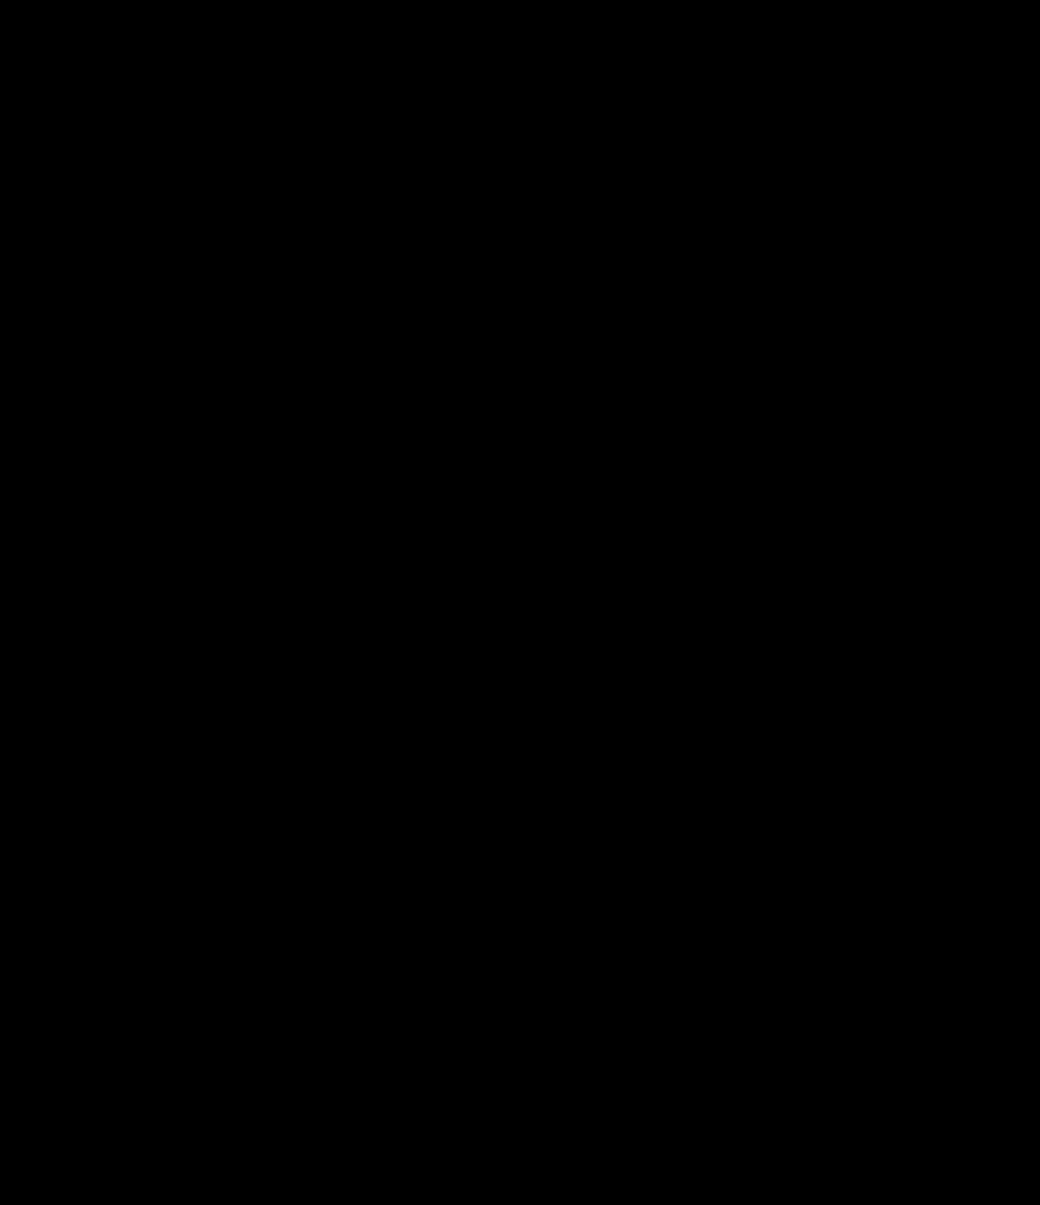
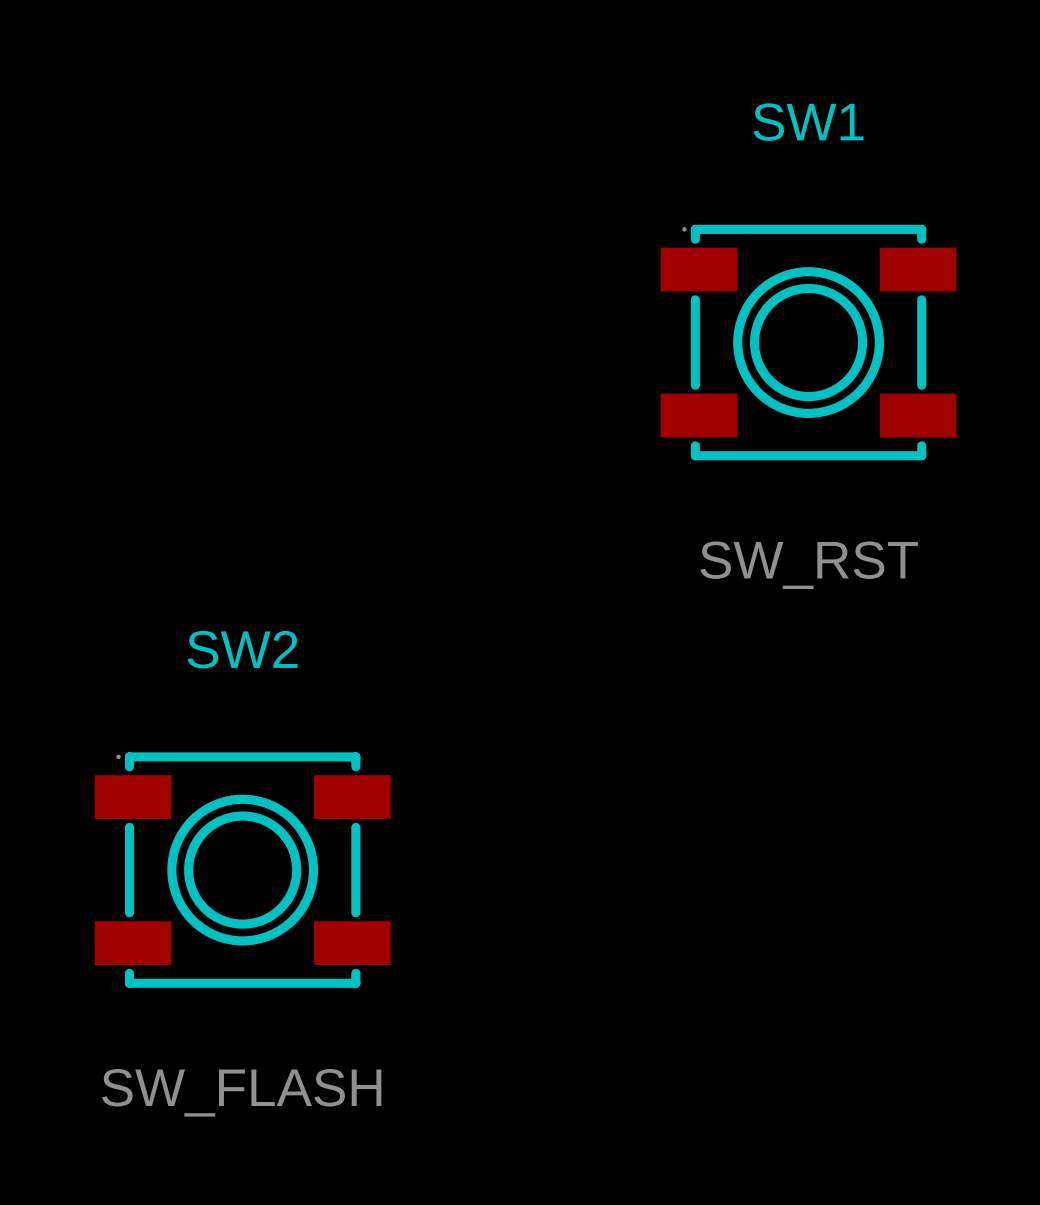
SW1: none -> SW_RST (808, 342)
SW2: none -> SW_FLASH (242, 870)

